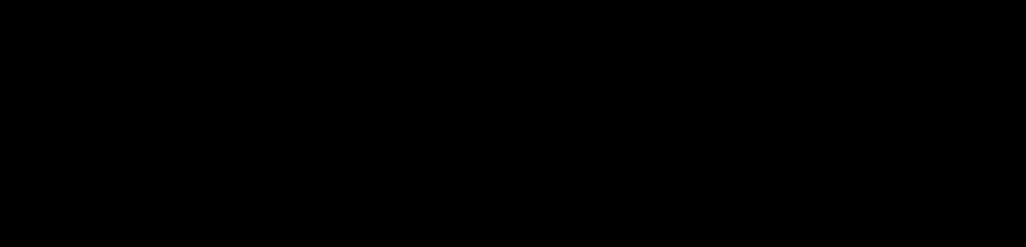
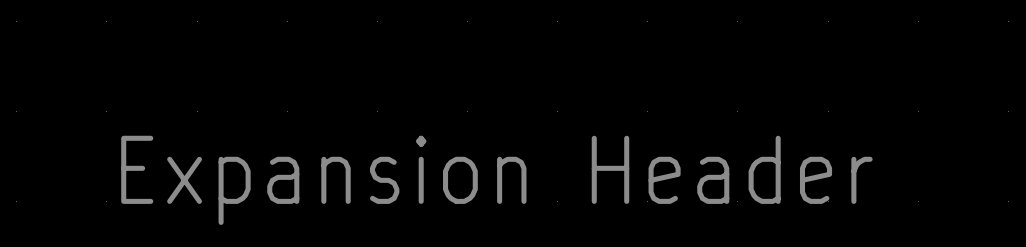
text: none -> Expansion Header (496, 180)

